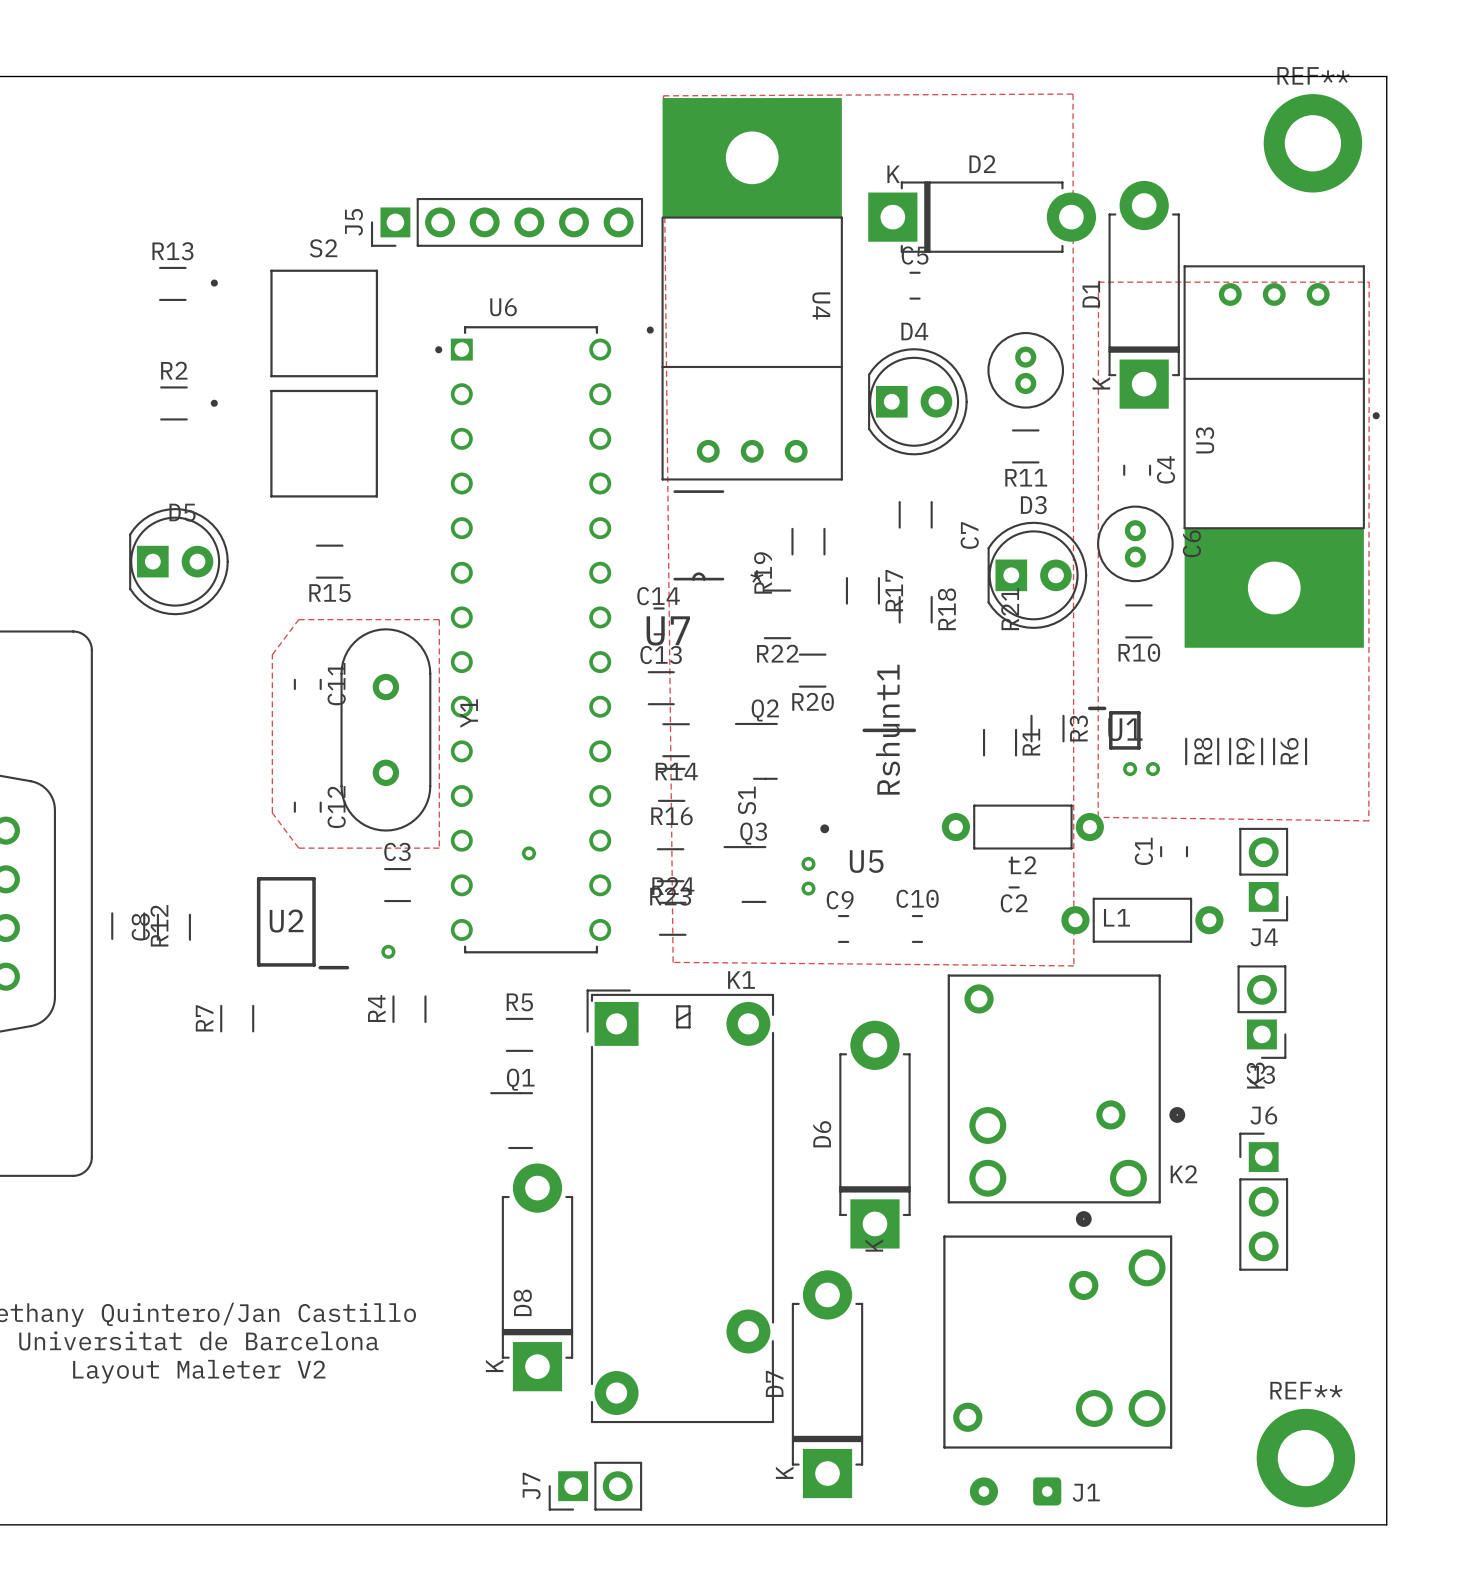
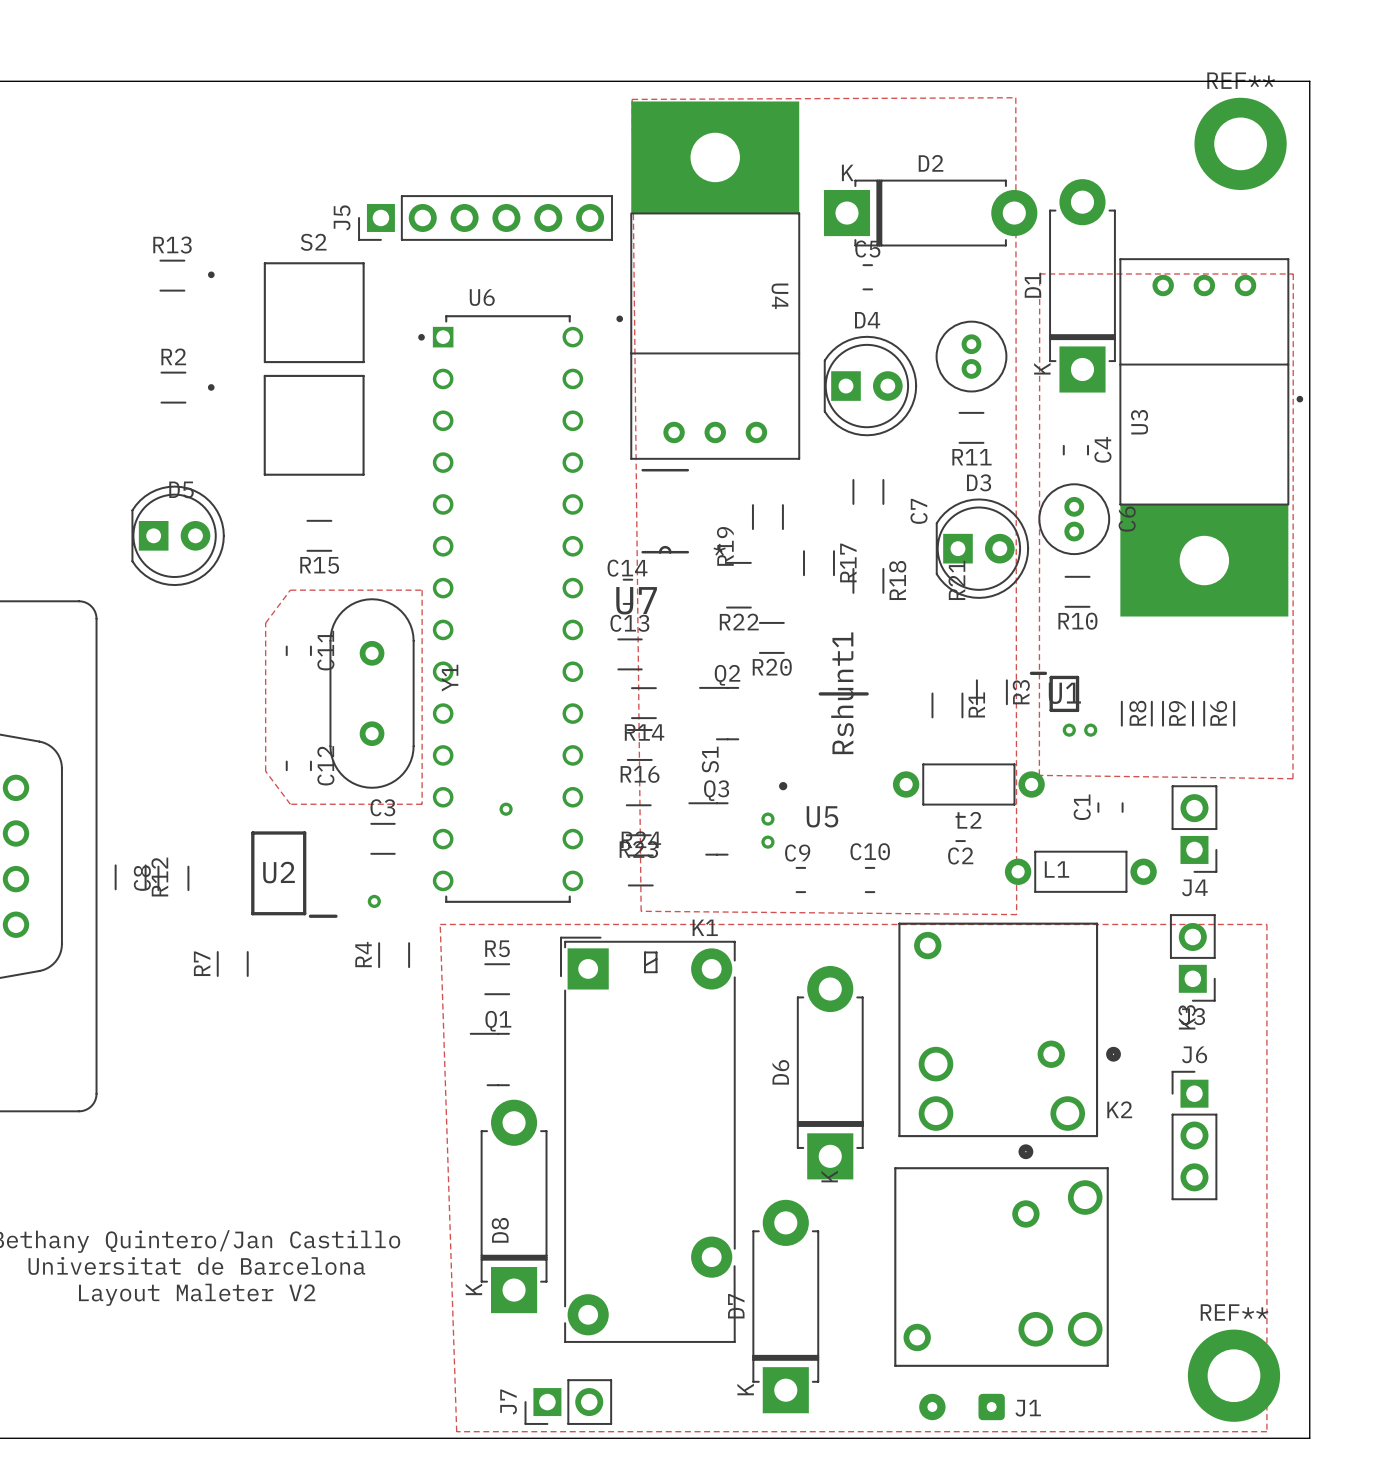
zone outline: none -> (440, 924) (456, 1431) (1266, 1431) (1266, 924) (440, 924)

